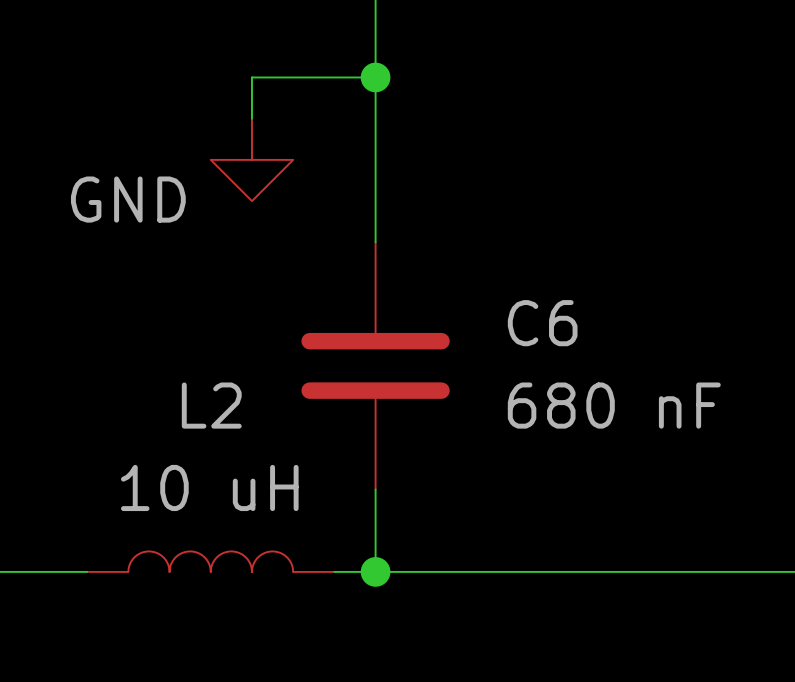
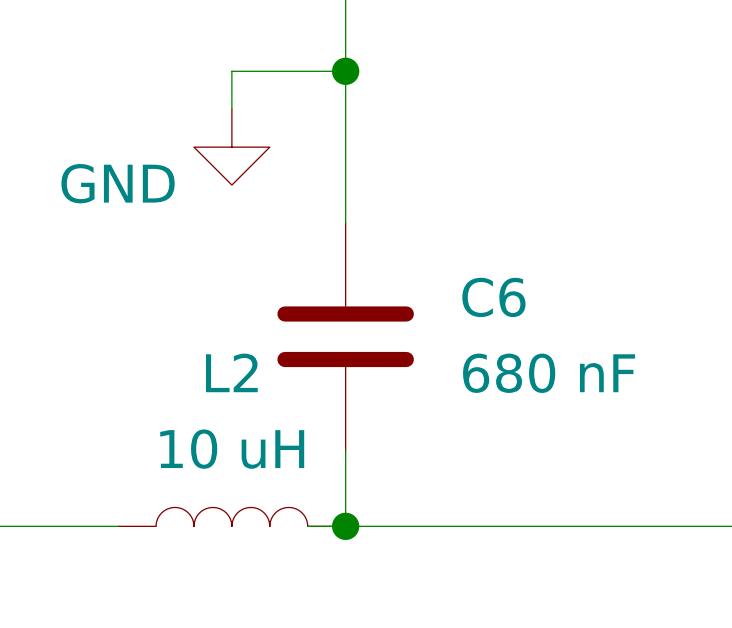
L2 position: (210, 561) -> (231, 516)

